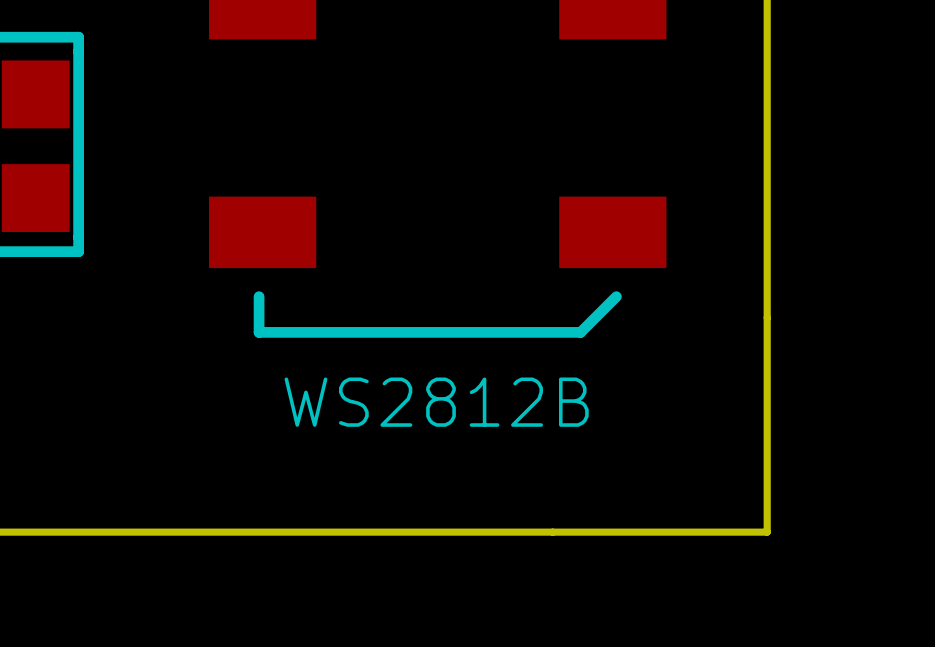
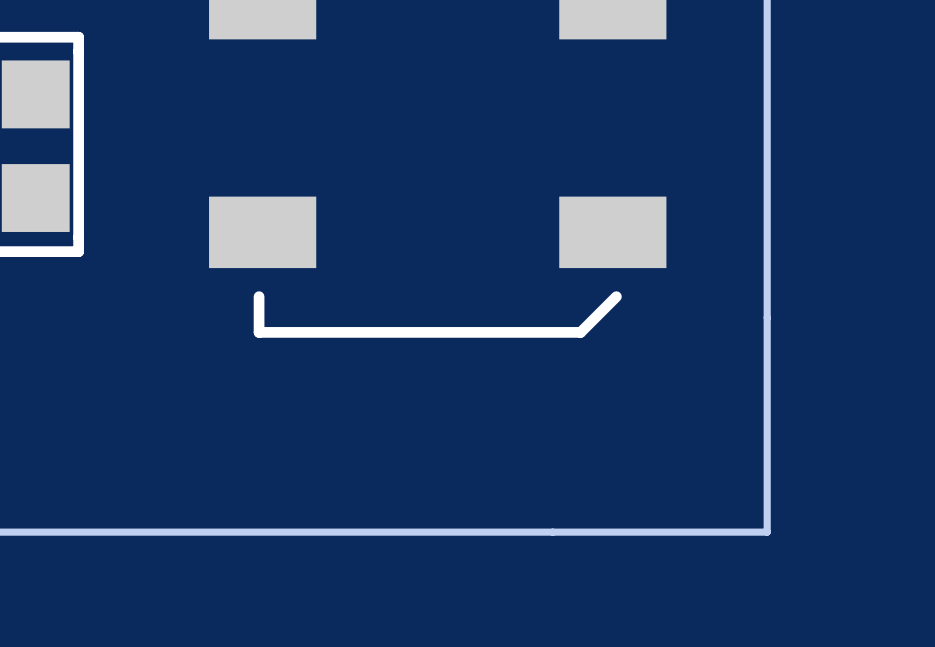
part value: WS2812B (436, 402) -> none

